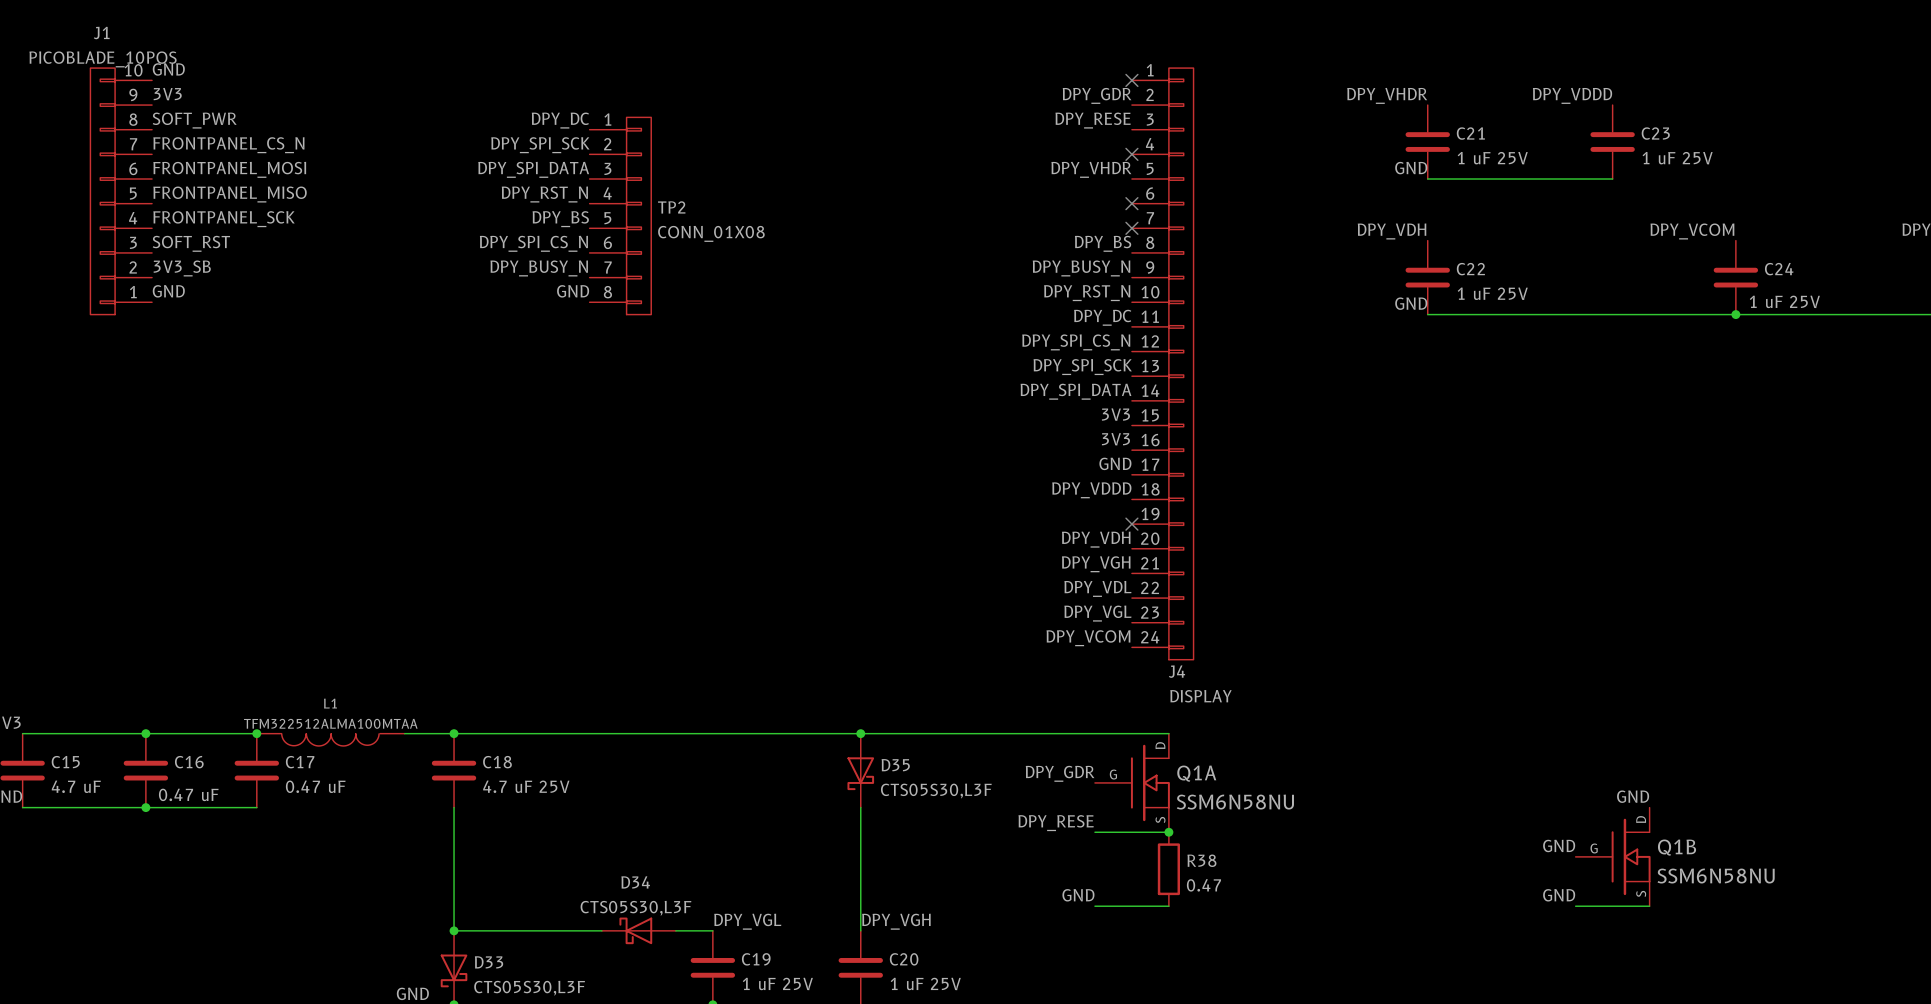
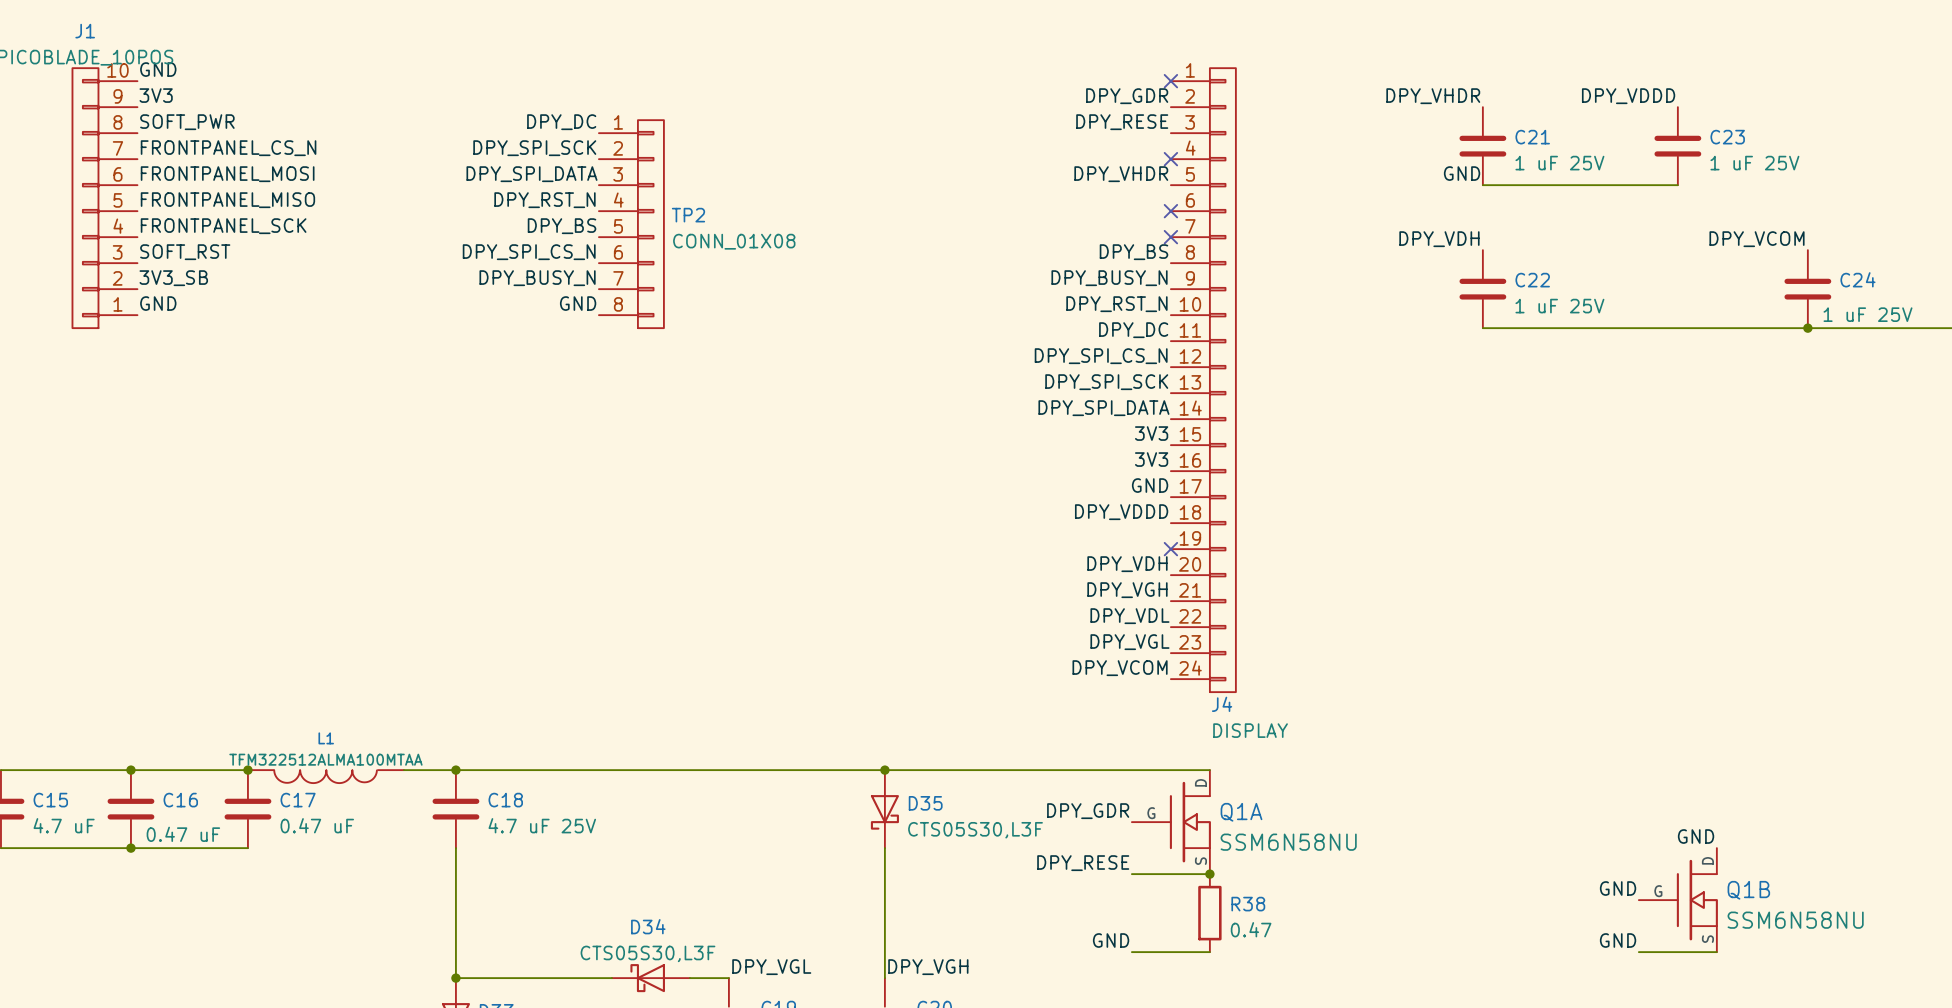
label: GND (1411, 303) -> none

